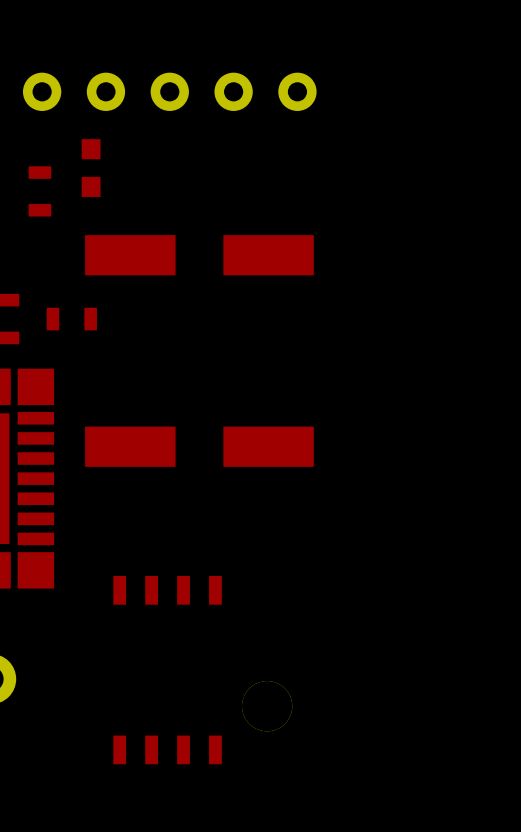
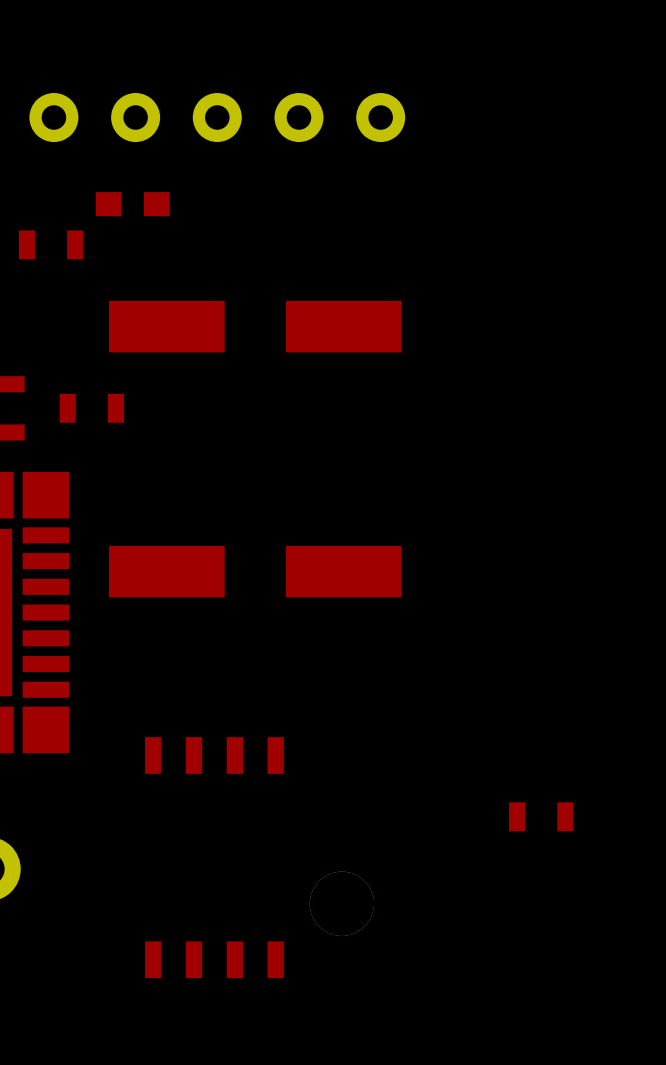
part rotation: 0° (91, 168) -> 90° clockwise (132, 204)
part rotation: 0° (39, 191) -> 90° clockwise (51, 244)
part: none -> (541, 816)

